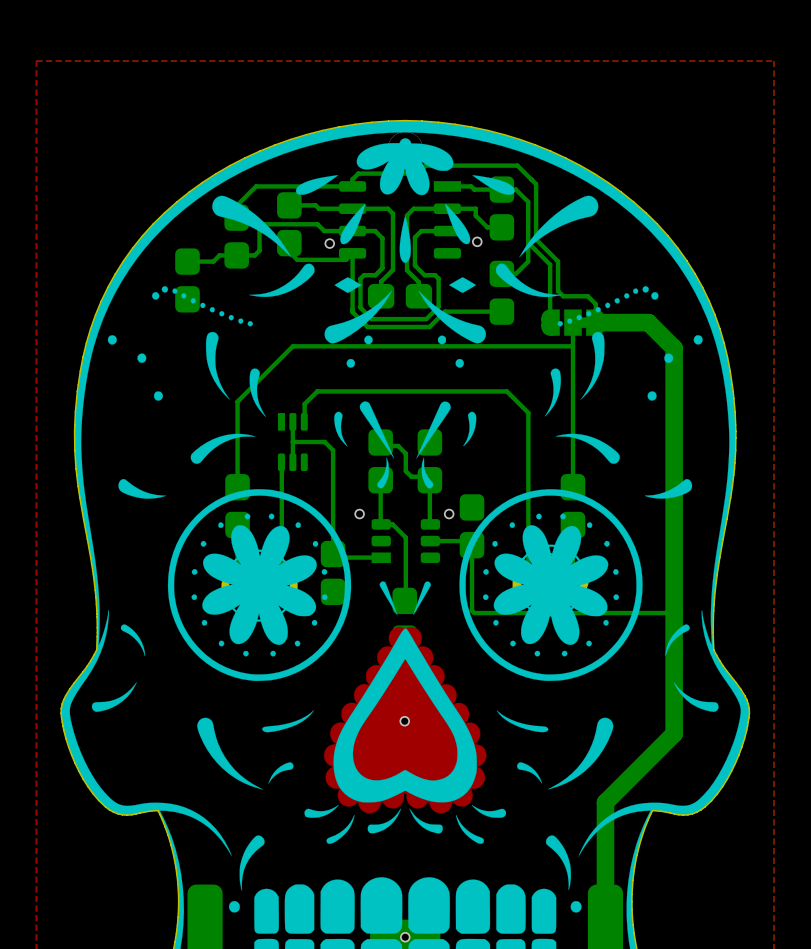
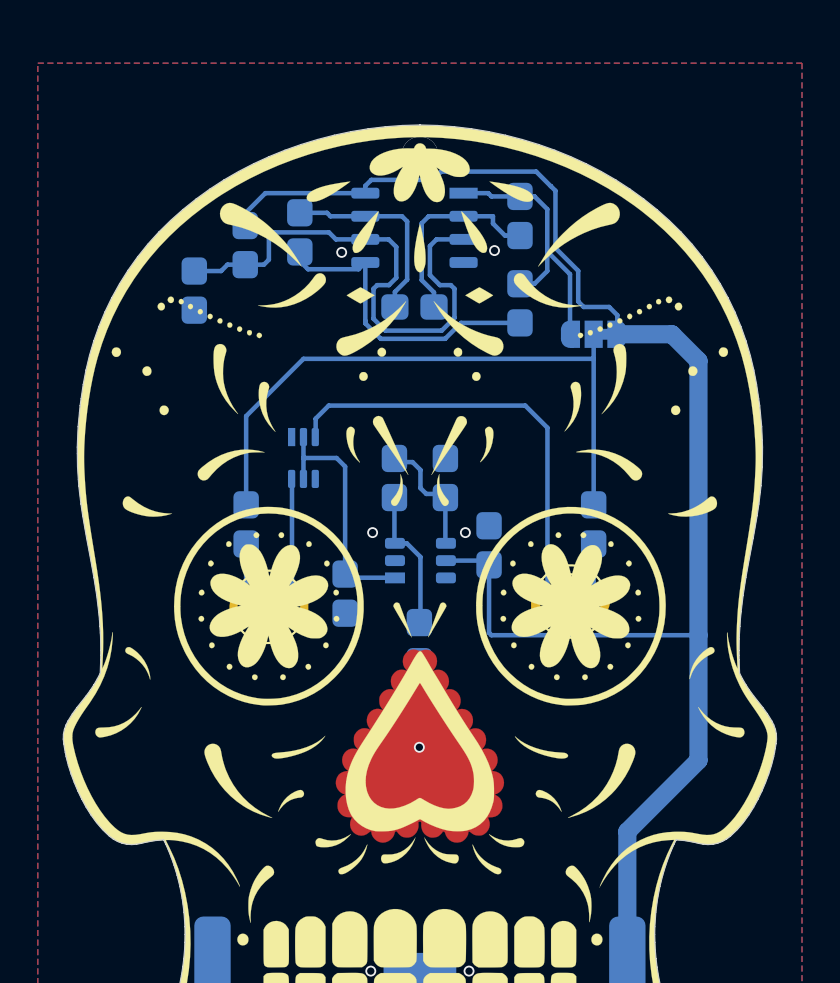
via: none -> (370, 971)
via: (405, 937) -> none
via: none -> (469, 971)

